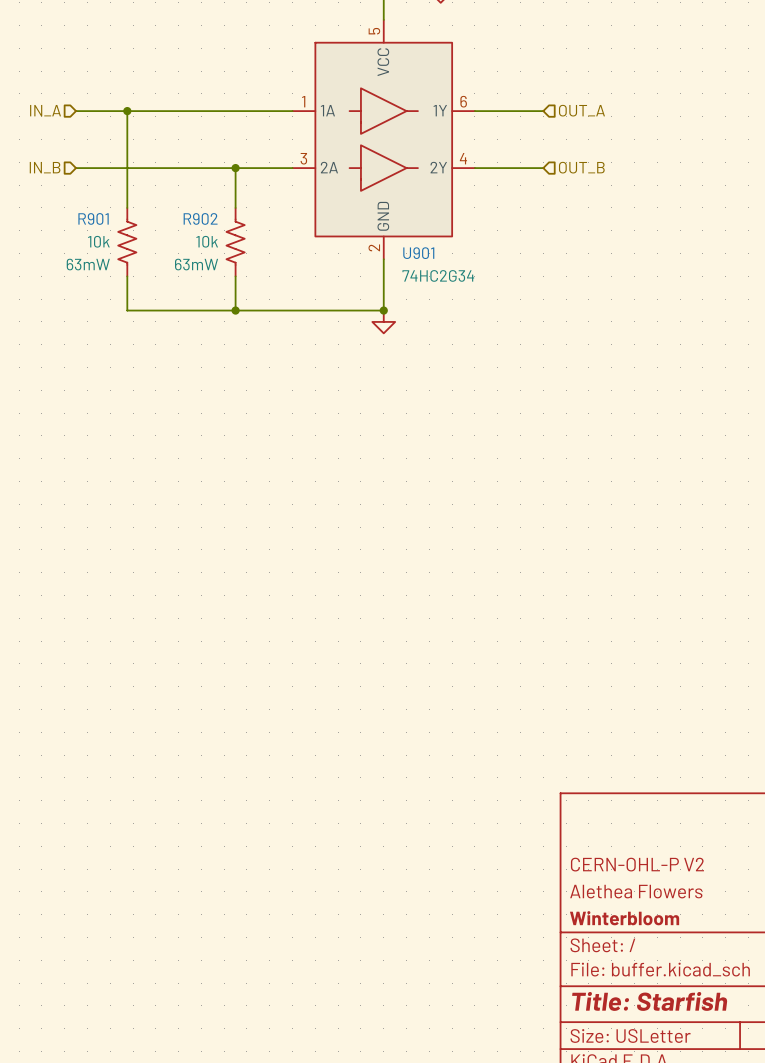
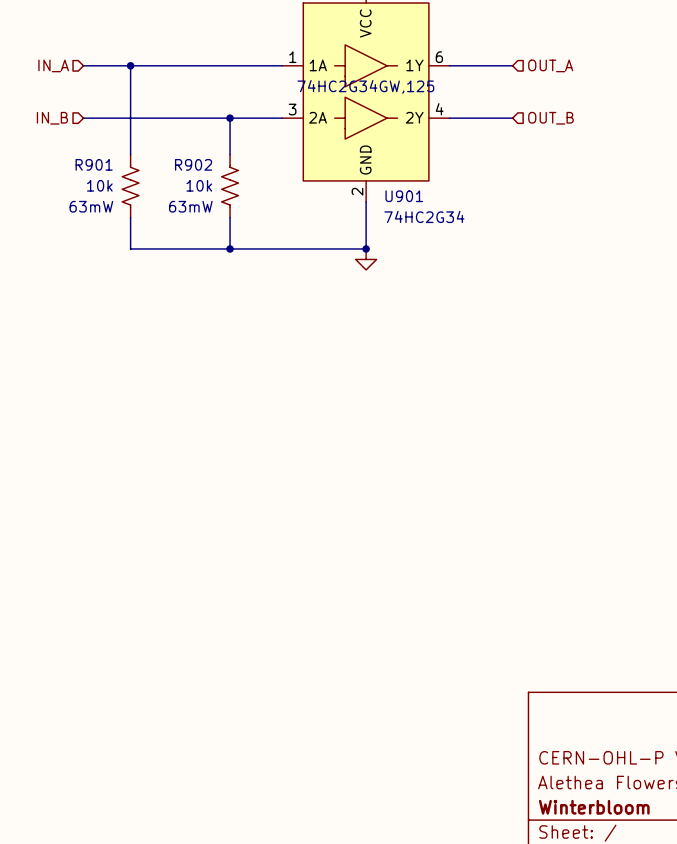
U901 text: none -> 74HC2G34GW,125 (365, 86)

